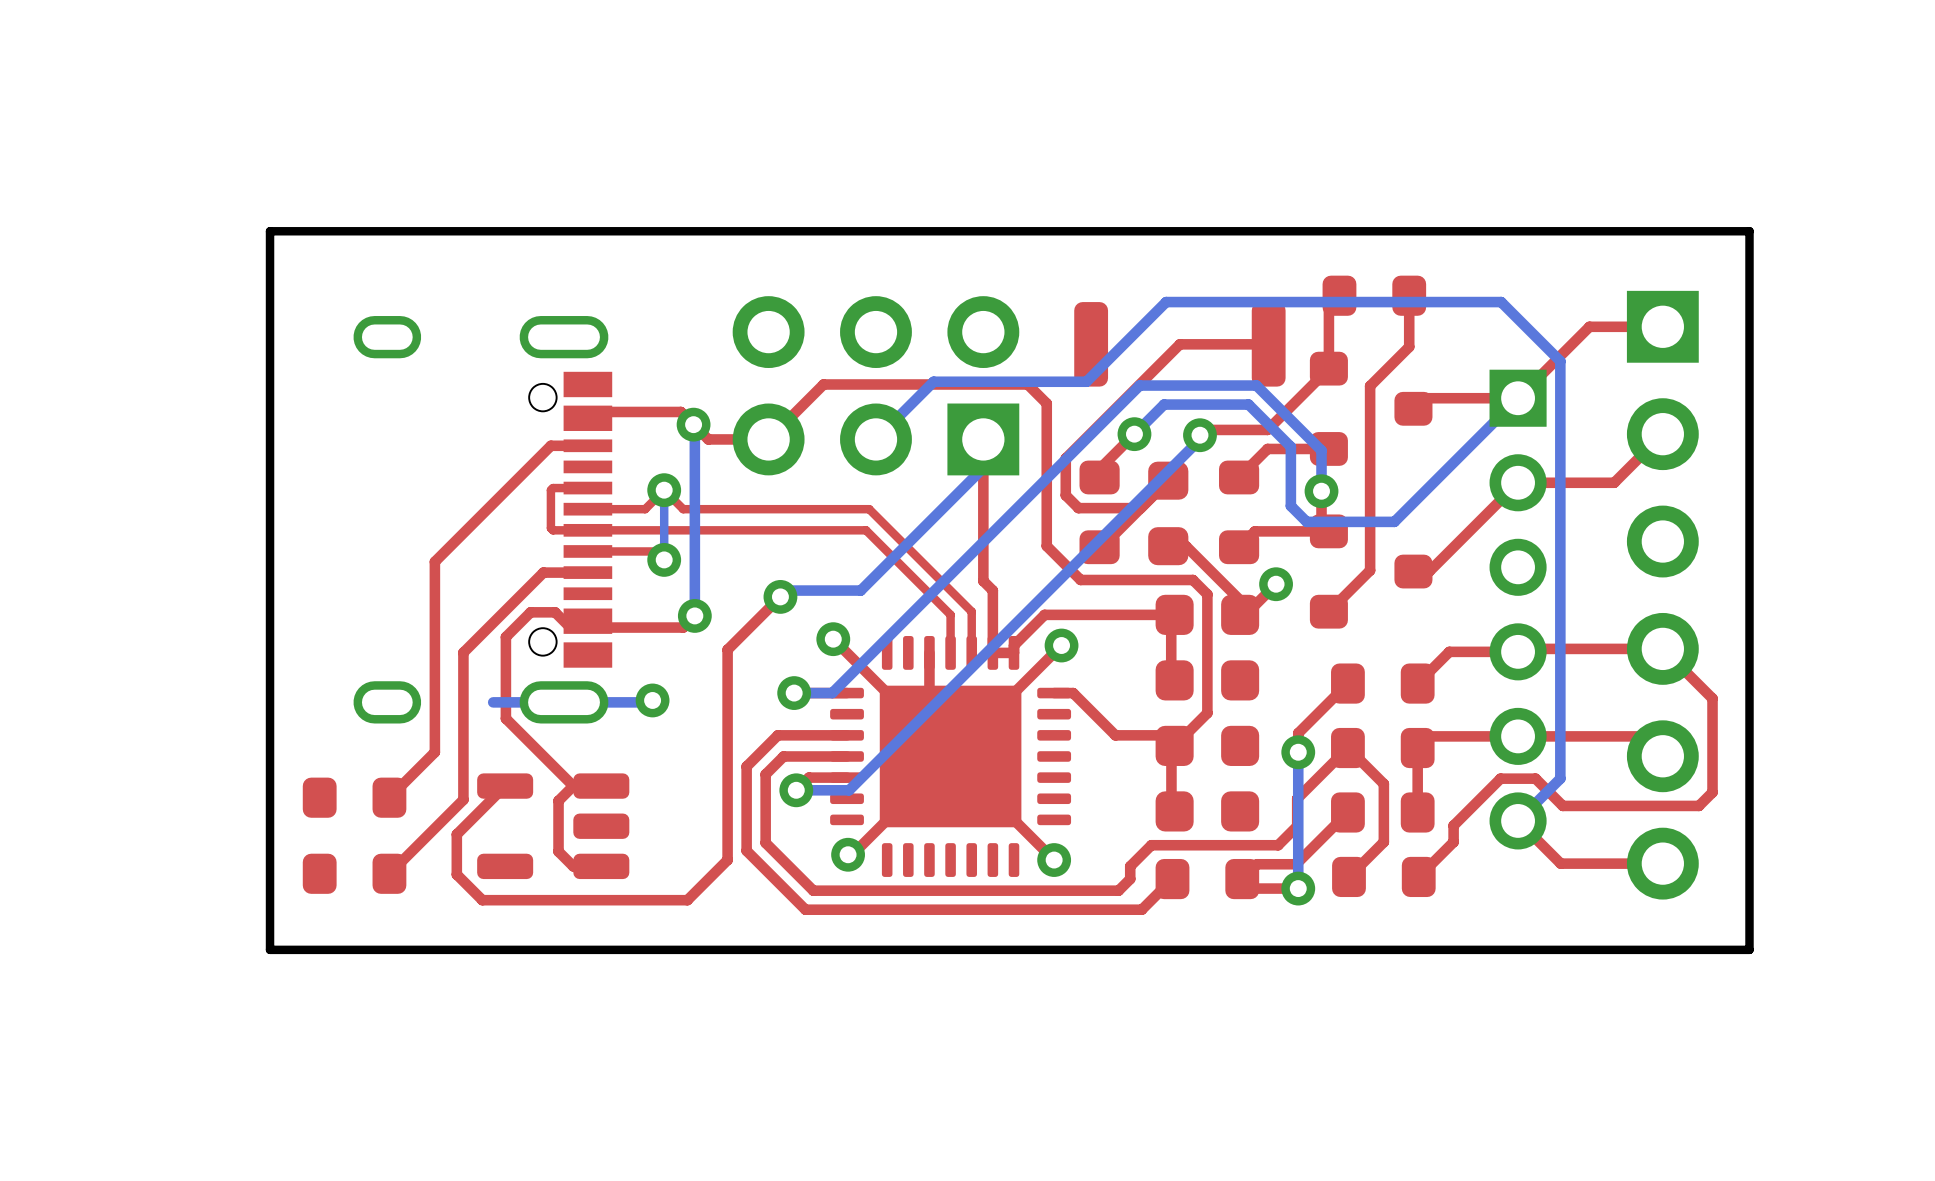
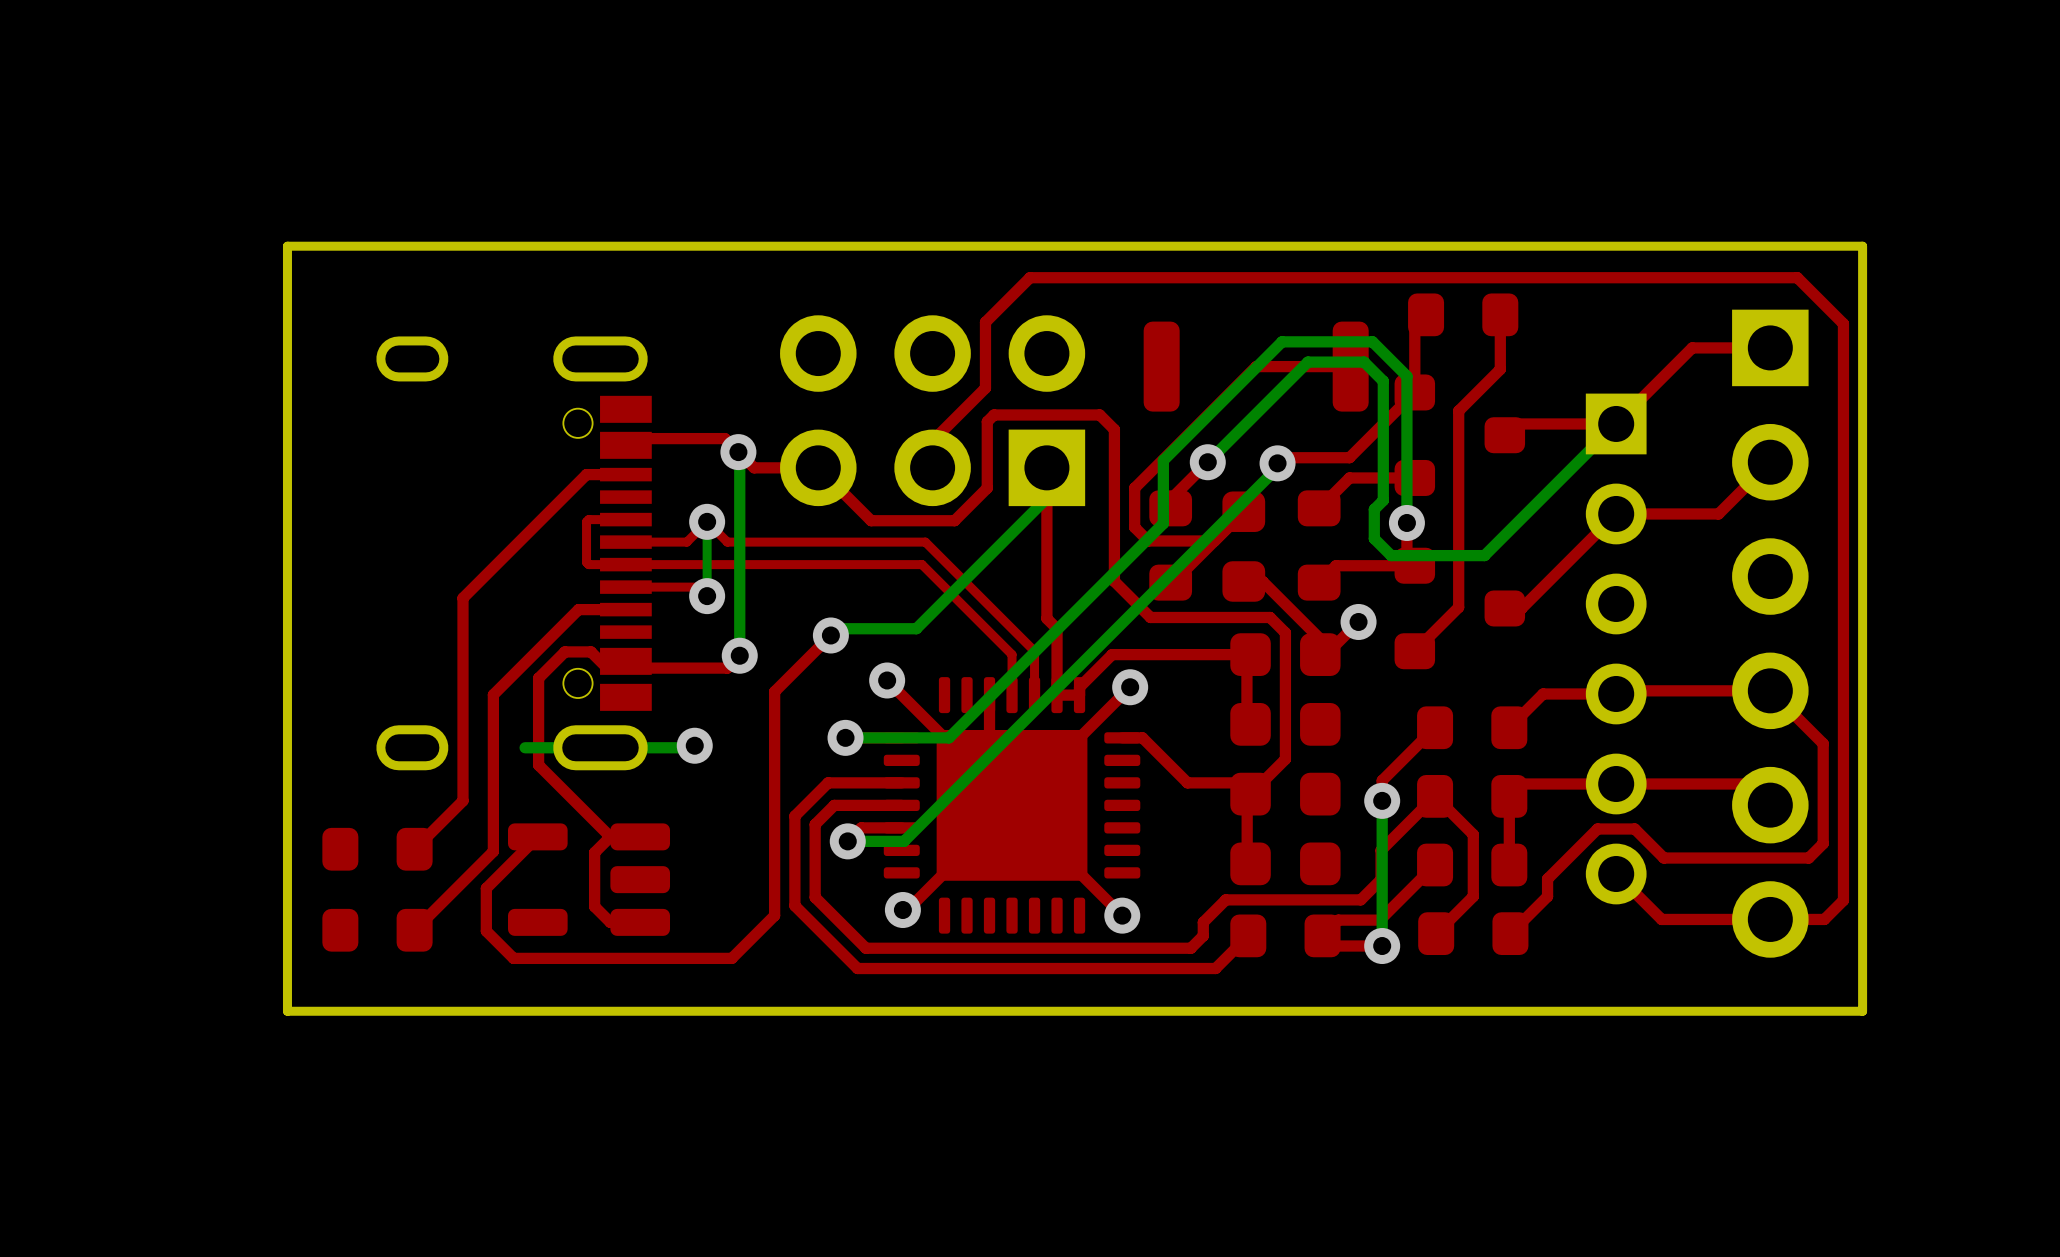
bottom track: (1139, 385) (1256, 385) (1321, 450) -> (1213, 410) (1282, 341) (1372, 341) (1406, 376) (1406, 479)
top track: (1033, 389) (1027, 384) (823, 384) (768, 439) -> (1099, 414) (994, 414) (987, 421) (987, 488) (954, 520) (871, 520) (818, 467)
bottom track: (1164, 404) (1248, 404) (1290, 446) (1290, 478) -> (1239, 430) (1307, 362) (1364, 362) (1383, 381) (1383, 500) (1374, 509)
bottom track: (1092, 432) (832, 693) -> (1163, 460) (1163, 523) (949, 737) (886, 737)
top track: none -> (932, 467) (932, 441) (985, 388) (985, 322) (1030, 277) (1797, 277) (1843, 323) (1843, 900) (1824, 919) (1770, 919)
bottom track: (875, 439) (933, 381) (1086, 381) (1166, 302) (1501, 302) (1560, 361) (1560, 778) (1518, 820) -> none

